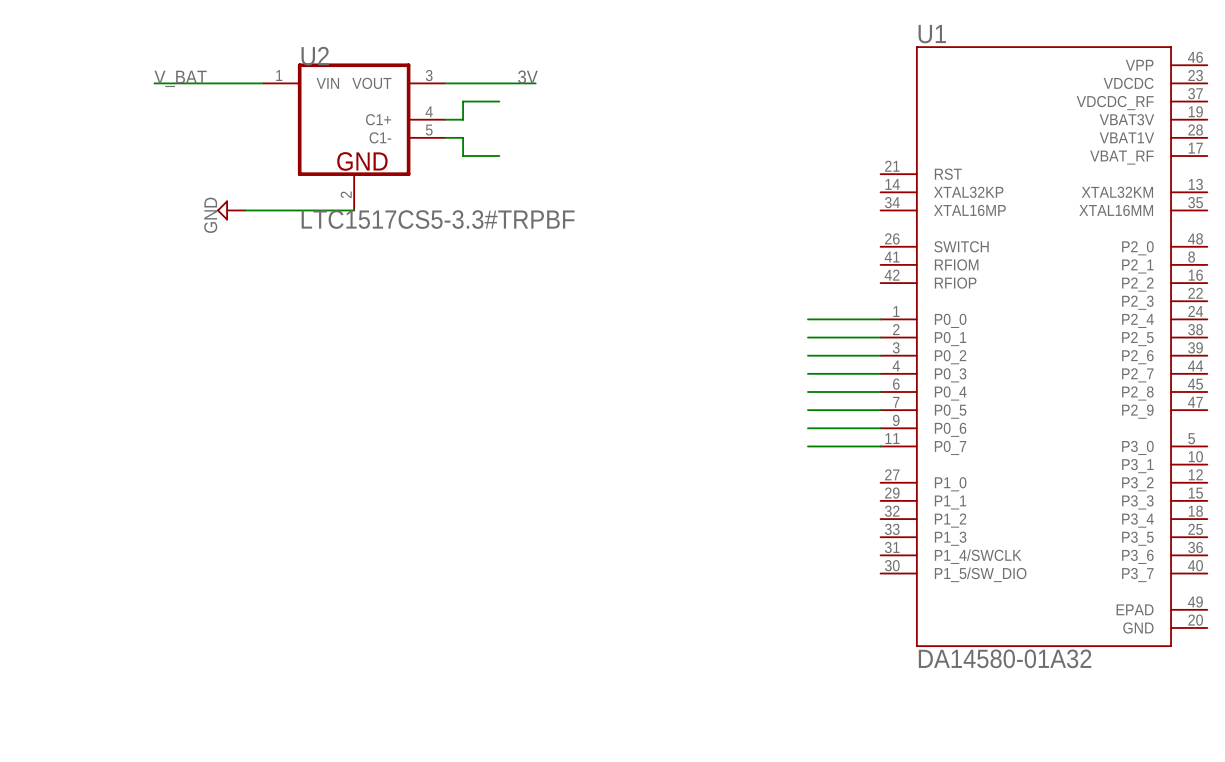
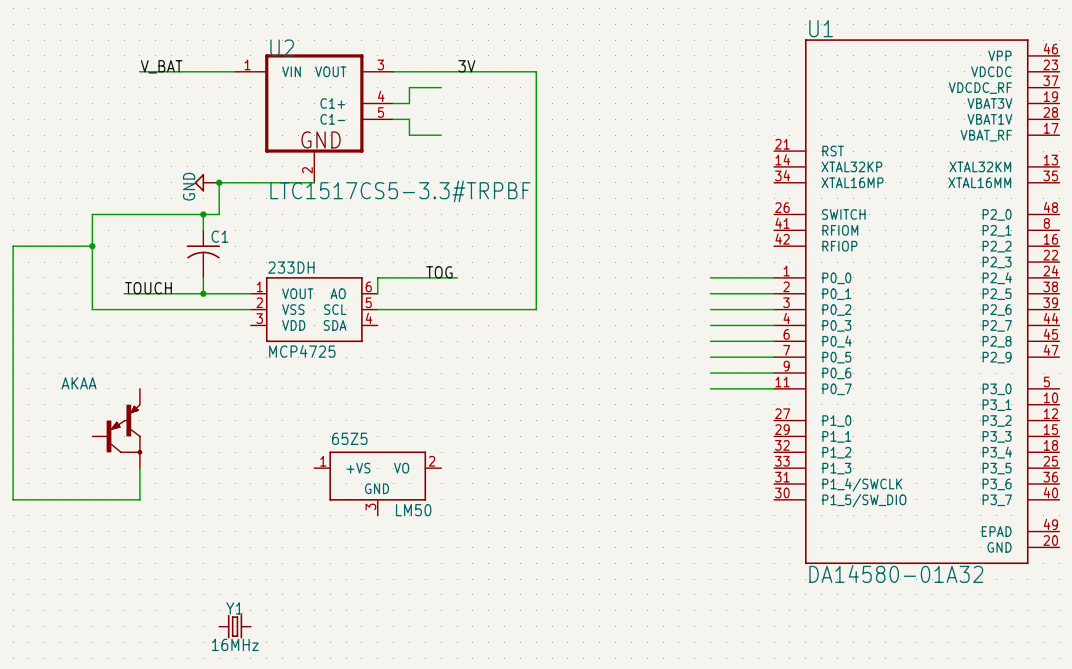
wire: none -> (472, 71) (536, 71) (536, 309) (377, 309)
wire: none -> (219, 182) (219, 214) (92, 214) (92, 309) (250, 309)
junction: none -> (219, 182)
wire: none -> (203, 214) (203, 230)
junction: none -> (203, 214)
wire: none -> (92, 246) (13, 246) (13, 499) (139, 499) (139, 468)
junction: none -> (92, 246)
C1: none -> (203, 254)
label: none -> TOG (439, 272)
wire: none -> (203, 277) (203, 293)
wire: none -> (457, 277) (377, 277) (377, 293)
label: none -> TOUCH (148, 288)
wire: none -> (124, 293) (250, 293)
junction: none -> (203, 293)
233DH: none -> MCP4725 (314, 309)
AKAA: none -> (117, 428)
65Z5: none -> LM50 (377, 483)
Y1: none -> 16MHz (235, 626)

